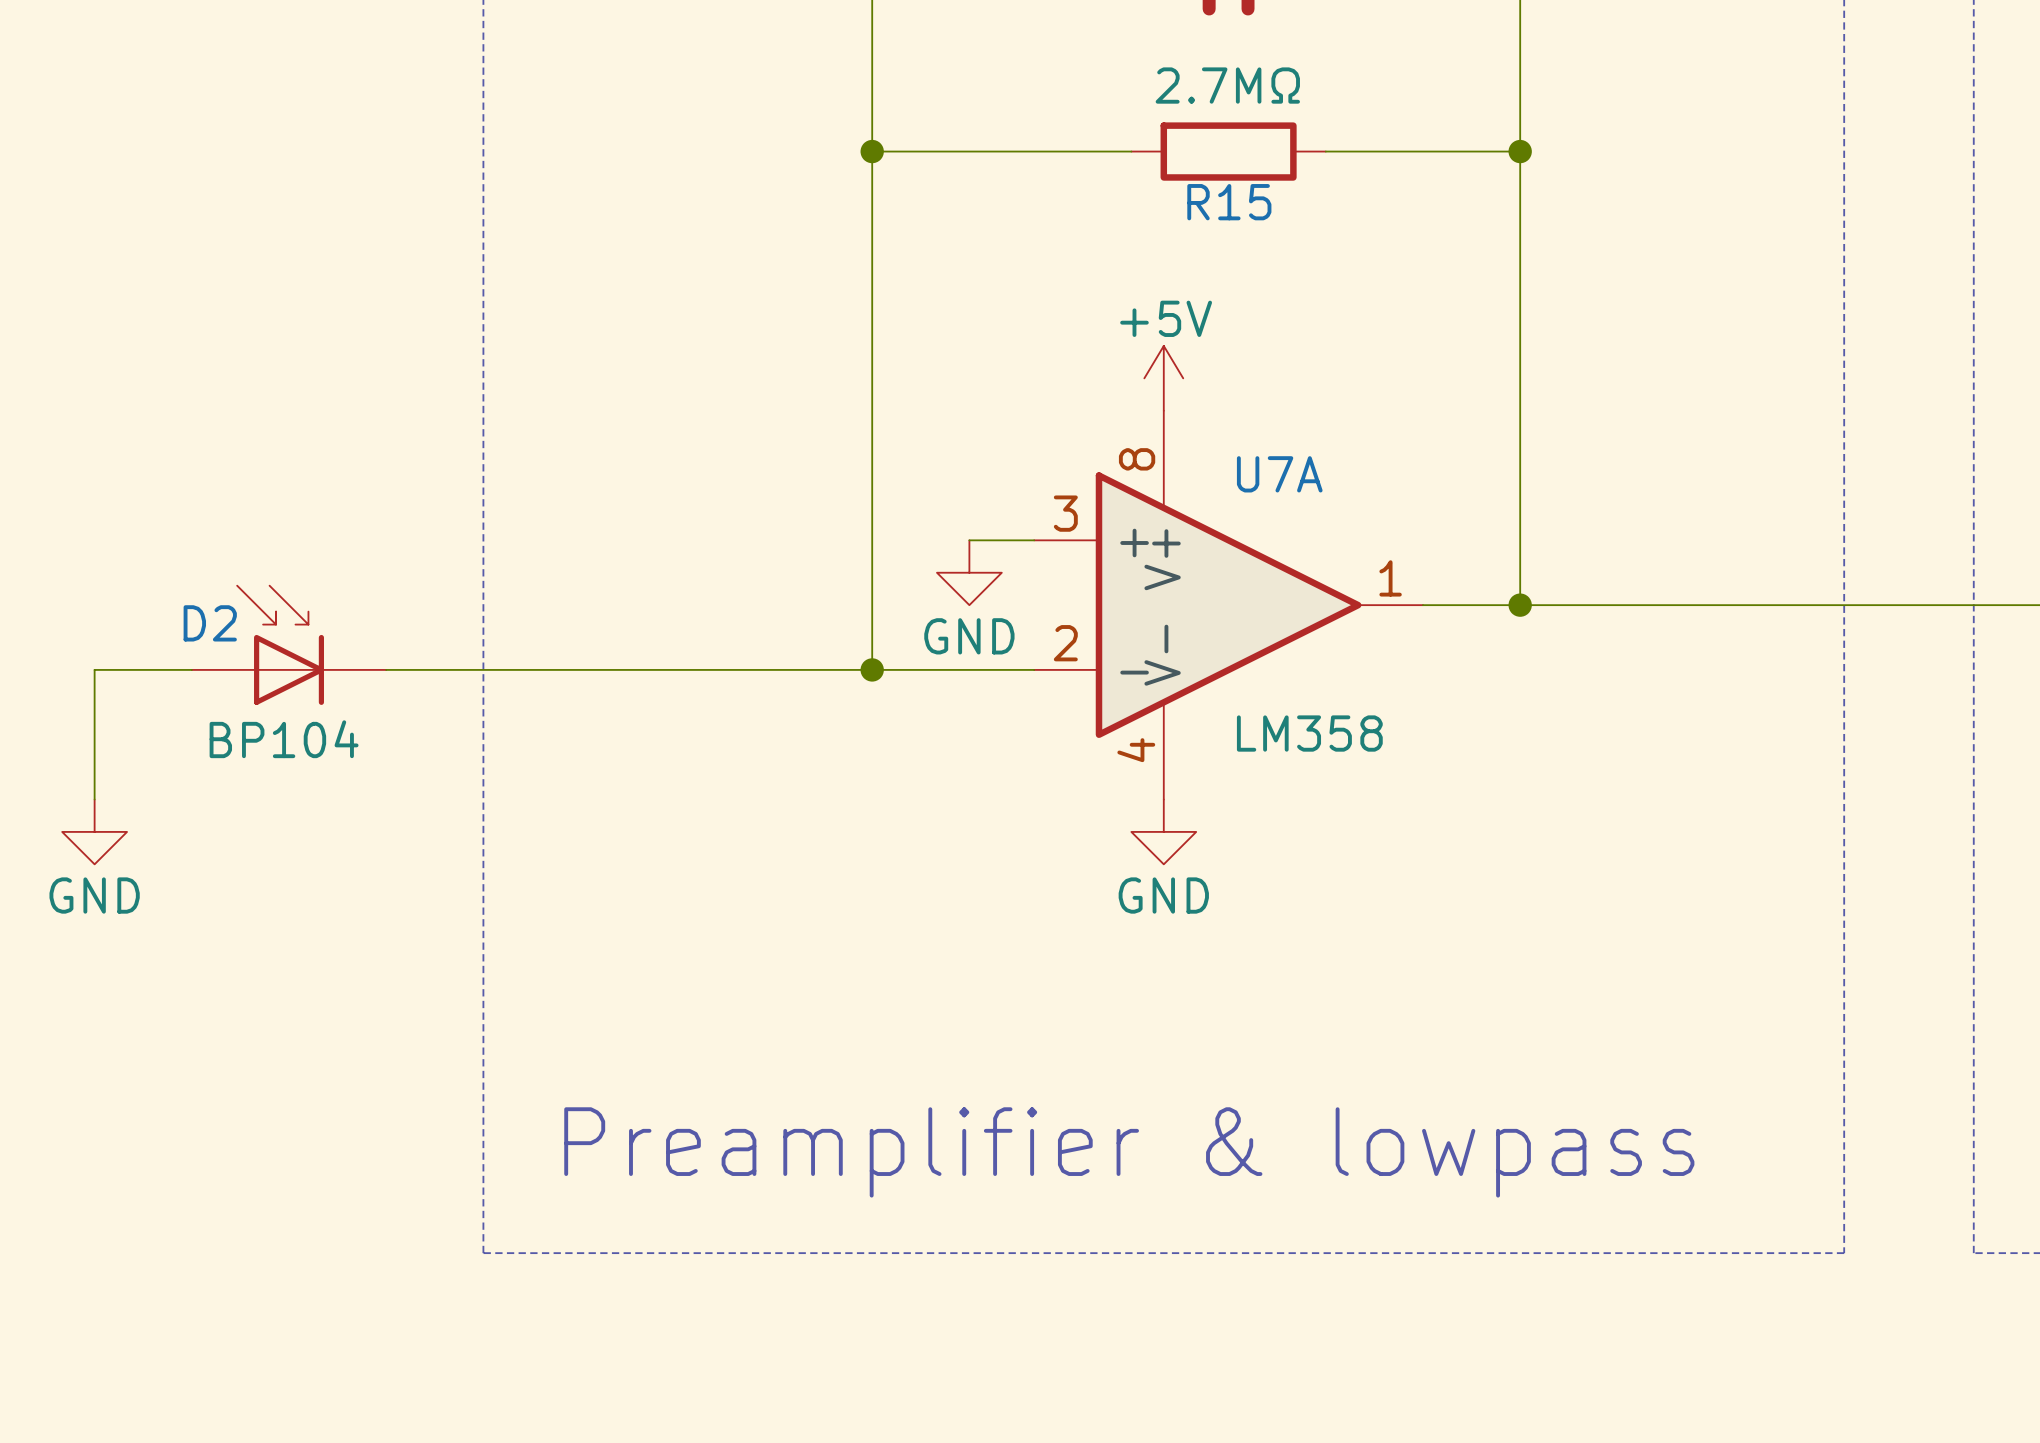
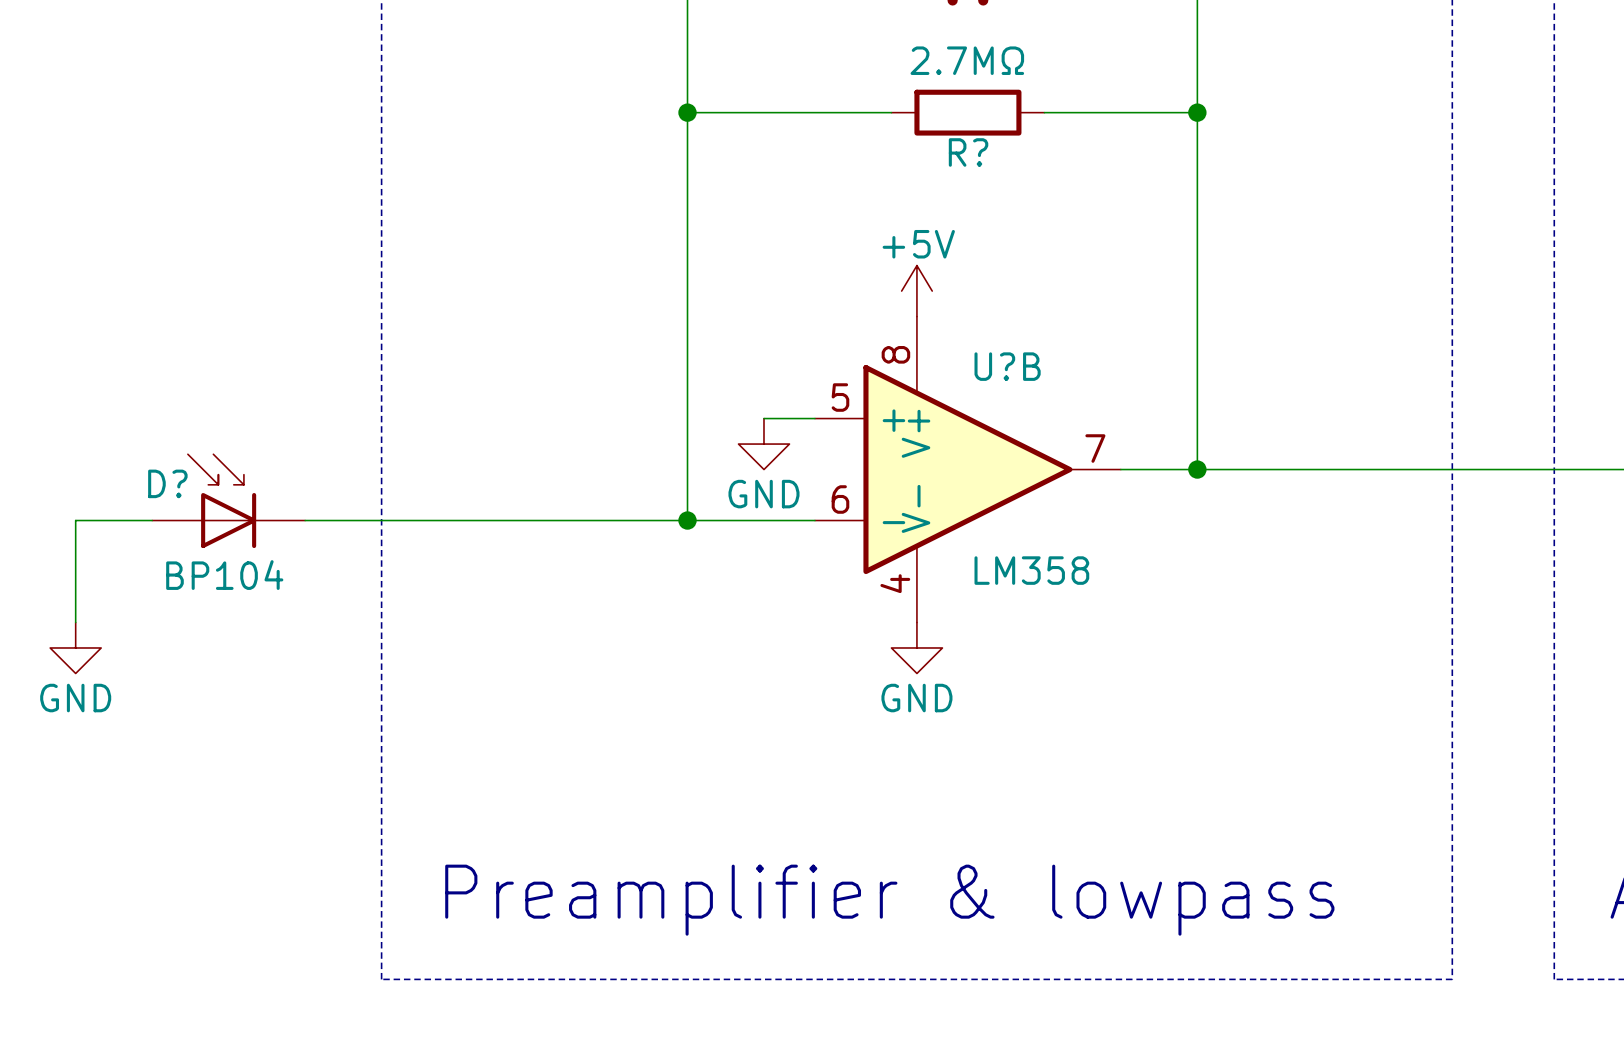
R15 name: R15 (1229, 202) -> R? (968, 152)
U7A name: U7A (1279, 474) -> U?B (1007, 366)
U7A pin number: 3 (1065, 513) -> 5 (840, 397)
U7A pin number: 1 (1390, 578) -> 7 (1095, 448)
D2 name: D2 (210, 623) -> D? (167, 483)
U7A pin number: 2 (1065, 643) -> 6 (840, 499)

